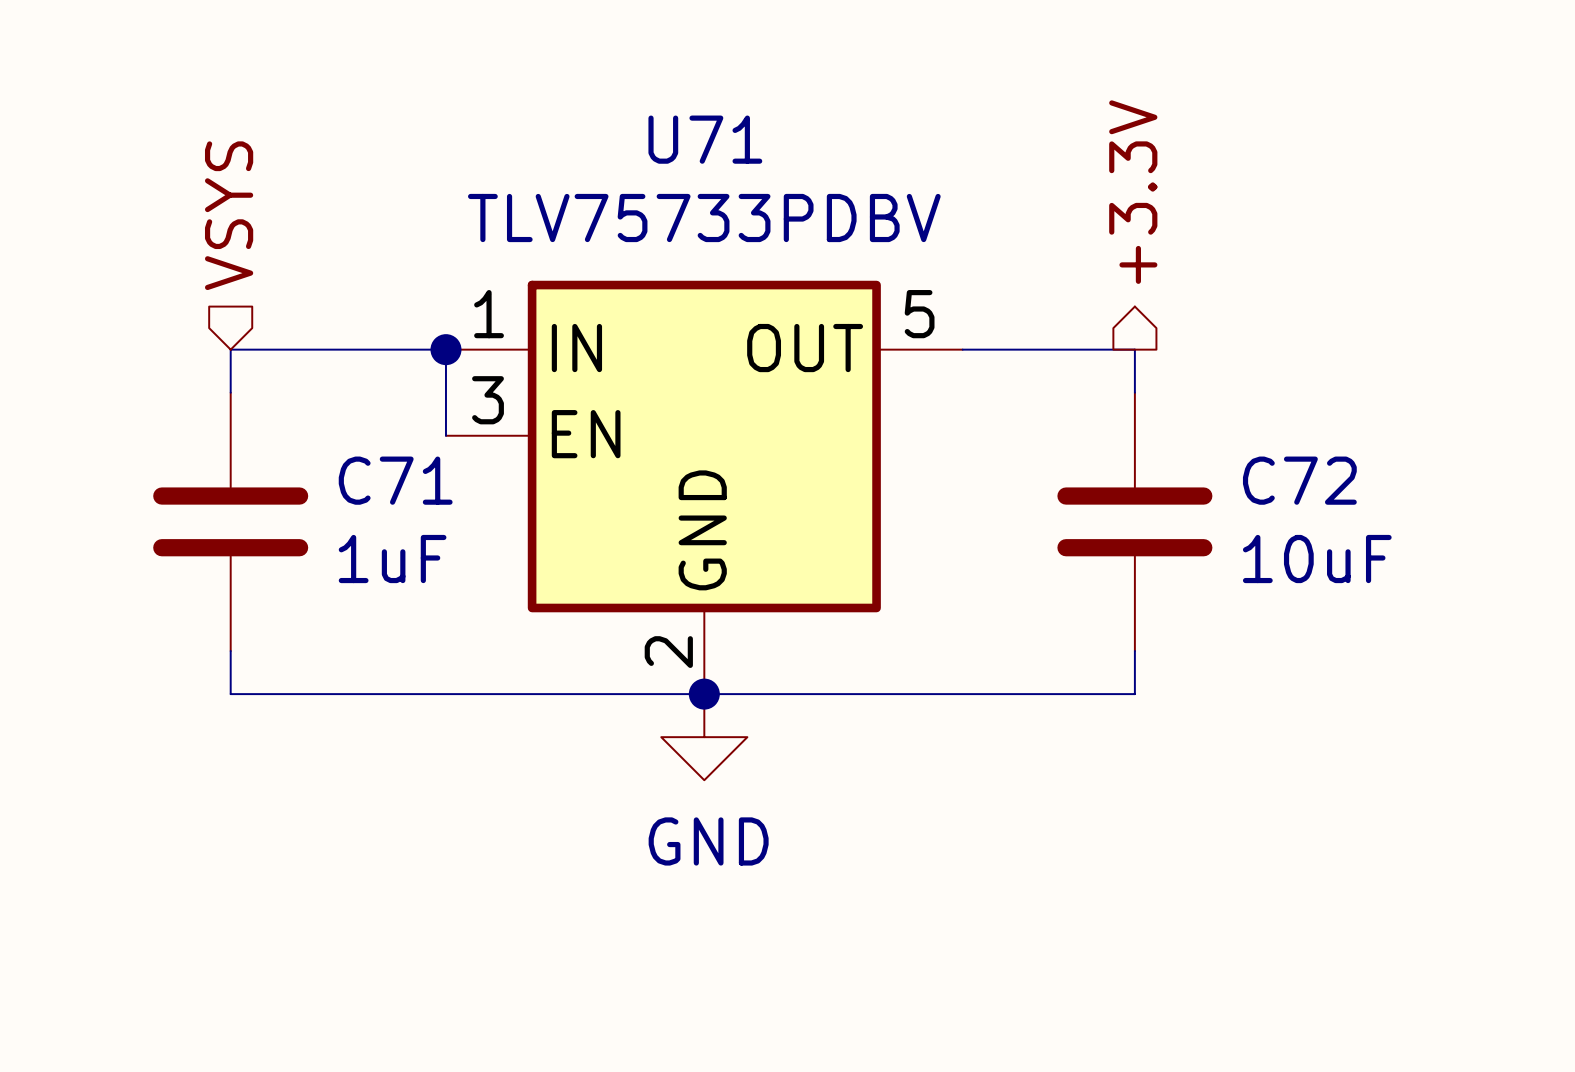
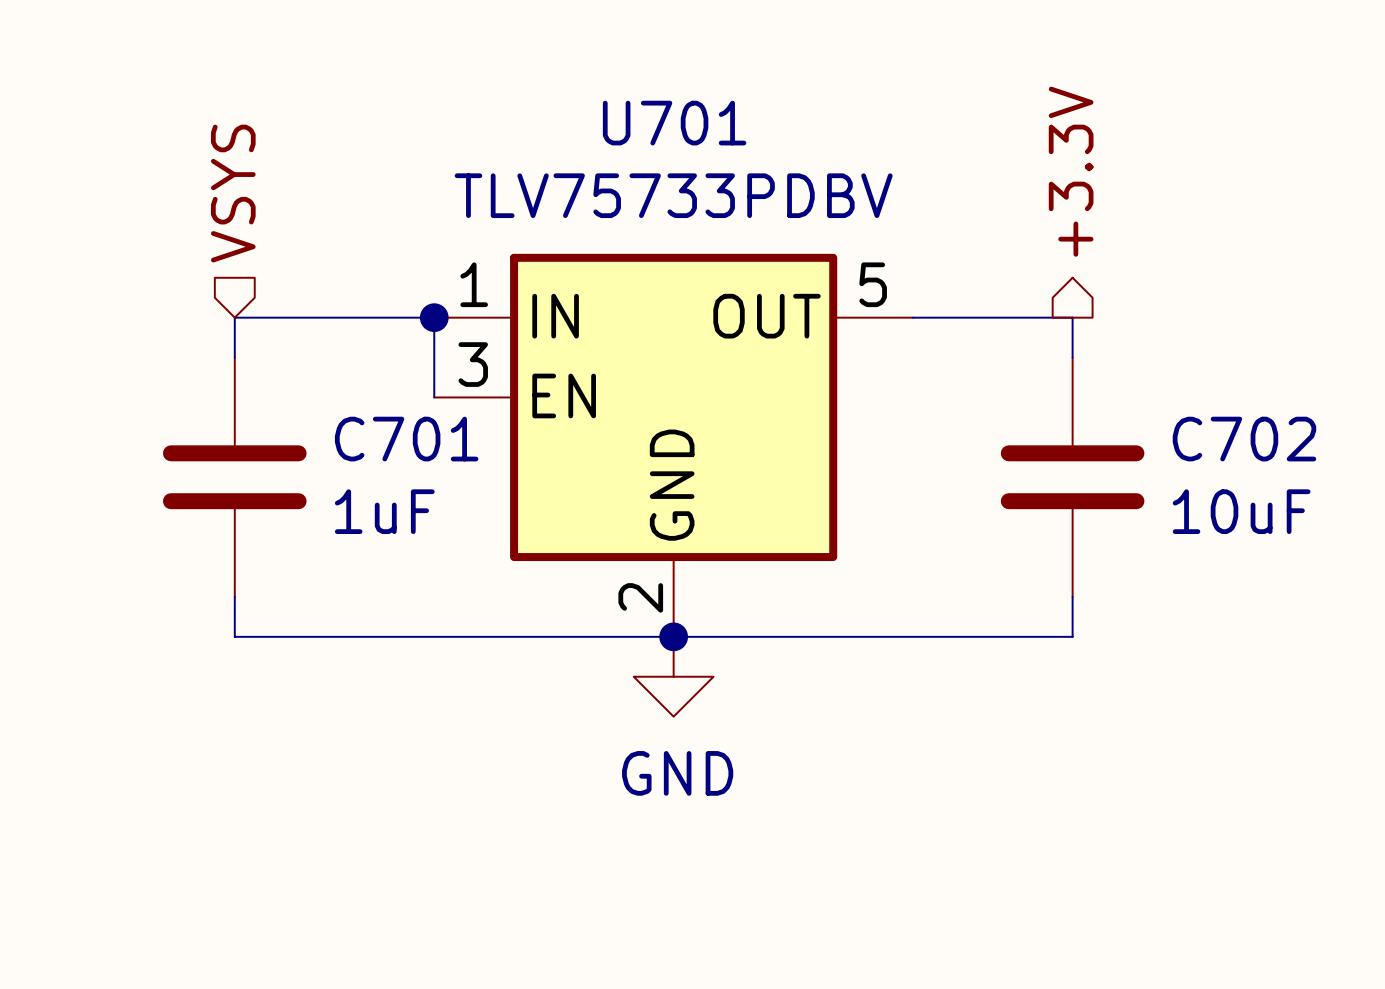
U71 name: U71 (705, 139) -> U701 (674, 123)
C71 name: C71 (395, 480) -> C701 (406, 439)
C72 name: C72 (1299, 480) -> C702 (1244, 439)

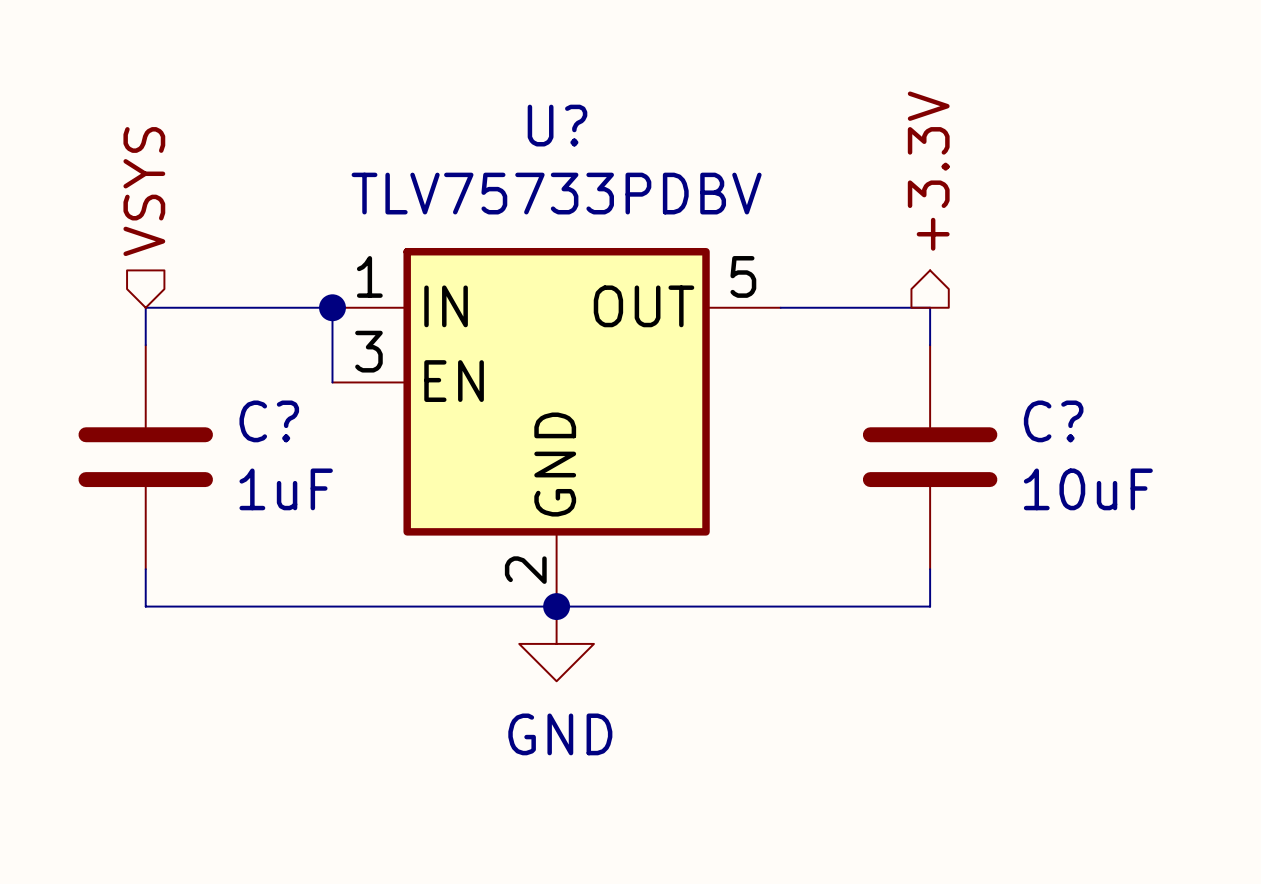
U701 name: U701 (674, 123) -> U? (557, 125)
C701 name: C701 (406, 439) -> C? (269, 421)
C702 name: C702 (1244, 439) -> C? (1053, 421)

